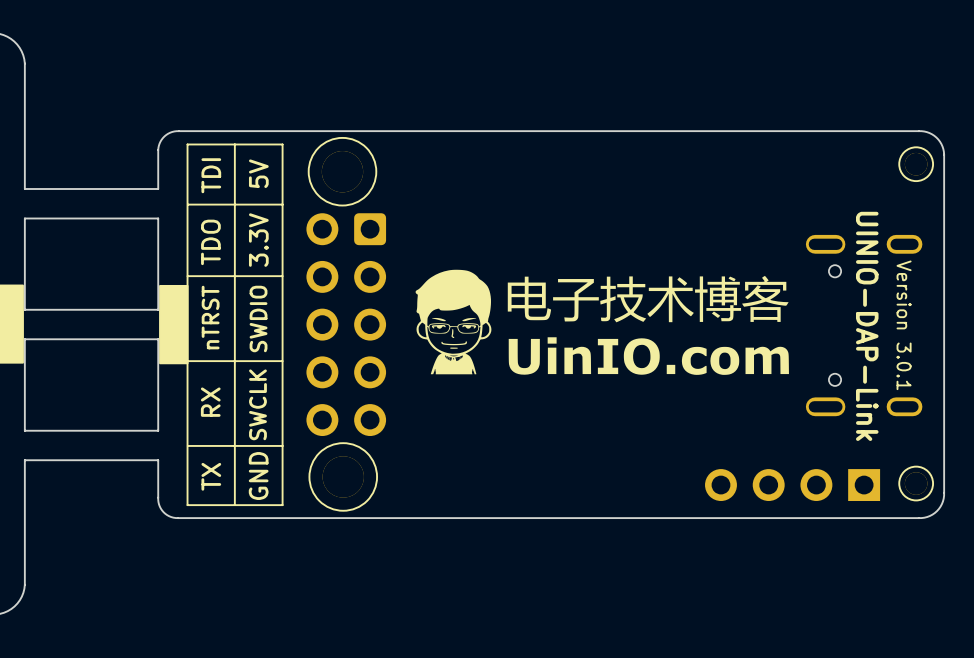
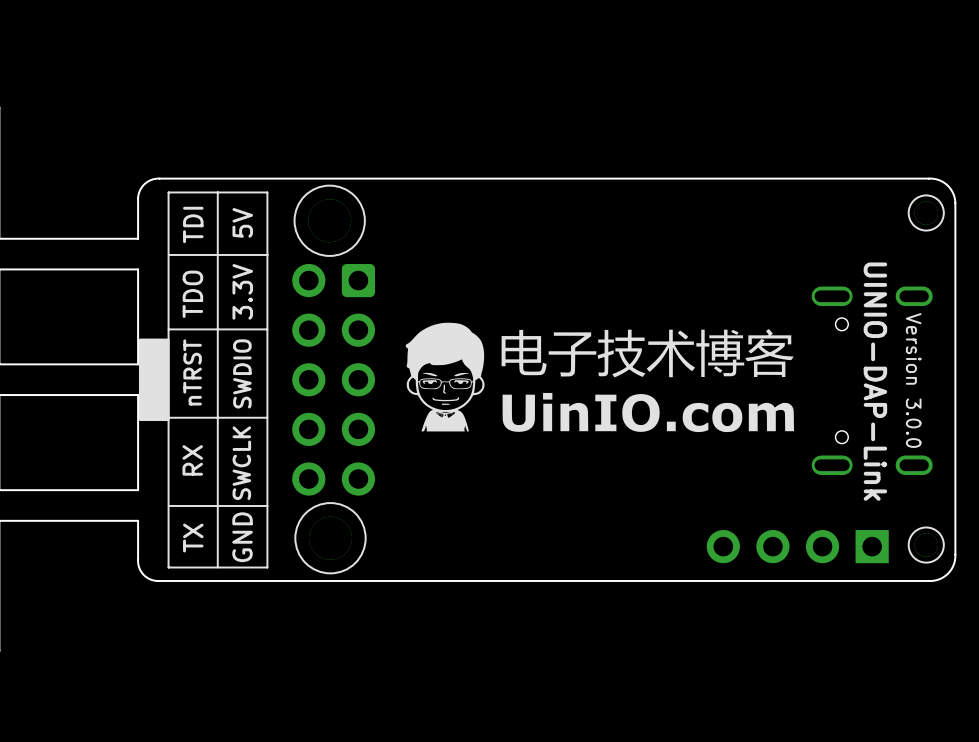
text: Version 3.0.1 (904, 325) -> Version 3.0.0 (913, 380)

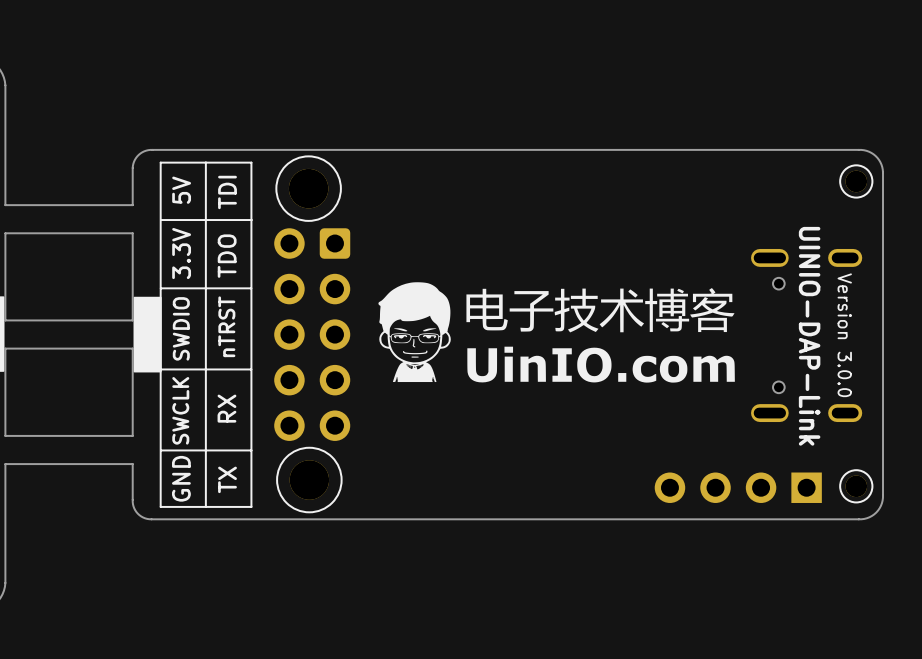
text: 5V (242, 222) -> TDI (227, 192)
text: TDI (193, 224) -> 5V (181, 190)
text: 3.3V (242, 291) -> TDO (227, 256)
text: TDO (192, 294) -> 3.3V (181, 253)
text: nTRST (192, 372) -> SWDIO (181, 328)
text: SWDIO (242, 373) -> nTRST (226, 326)
text: RX (192, 460) -> SWCLK (180, 410)
text: SWCLK (241, 463) -> RX (226, 408)
text: GND (242, 537) -> TX (227, 479)
text: TX (193, 538) -> GND (181, 478)

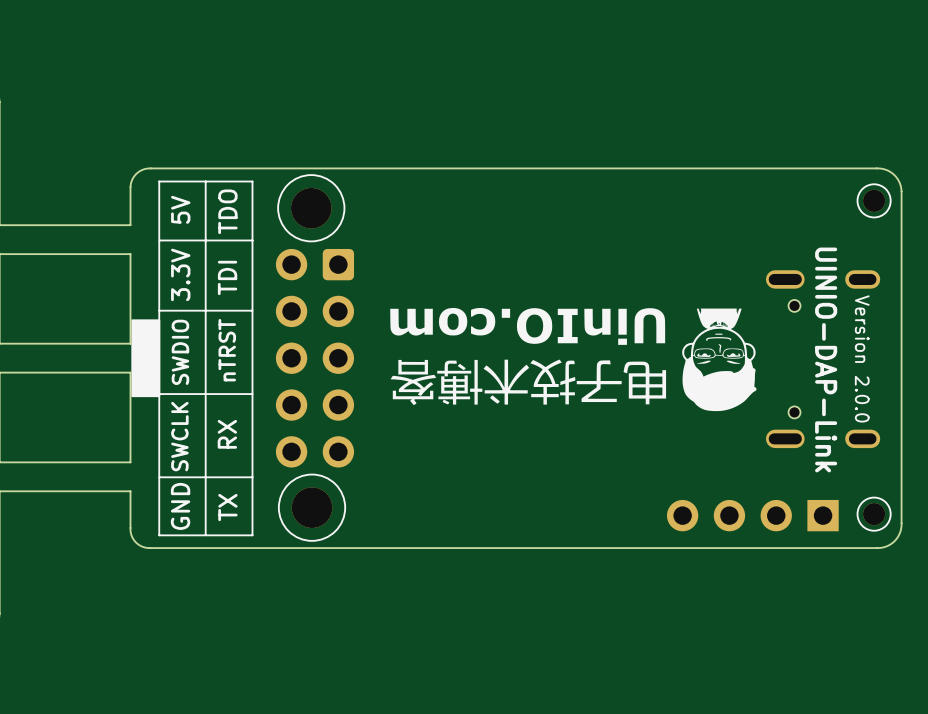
text: TDI (227, 192) -> TDO (227, 211)
text: TDO (227, 256) -> TDI (227, 277)
drawing shape: [378, 282, 735, 383] -> [390, 307, 757, 412]
text: Version 3.0.0 (844, 335) -> Version 2.0.0 (862, 358)

